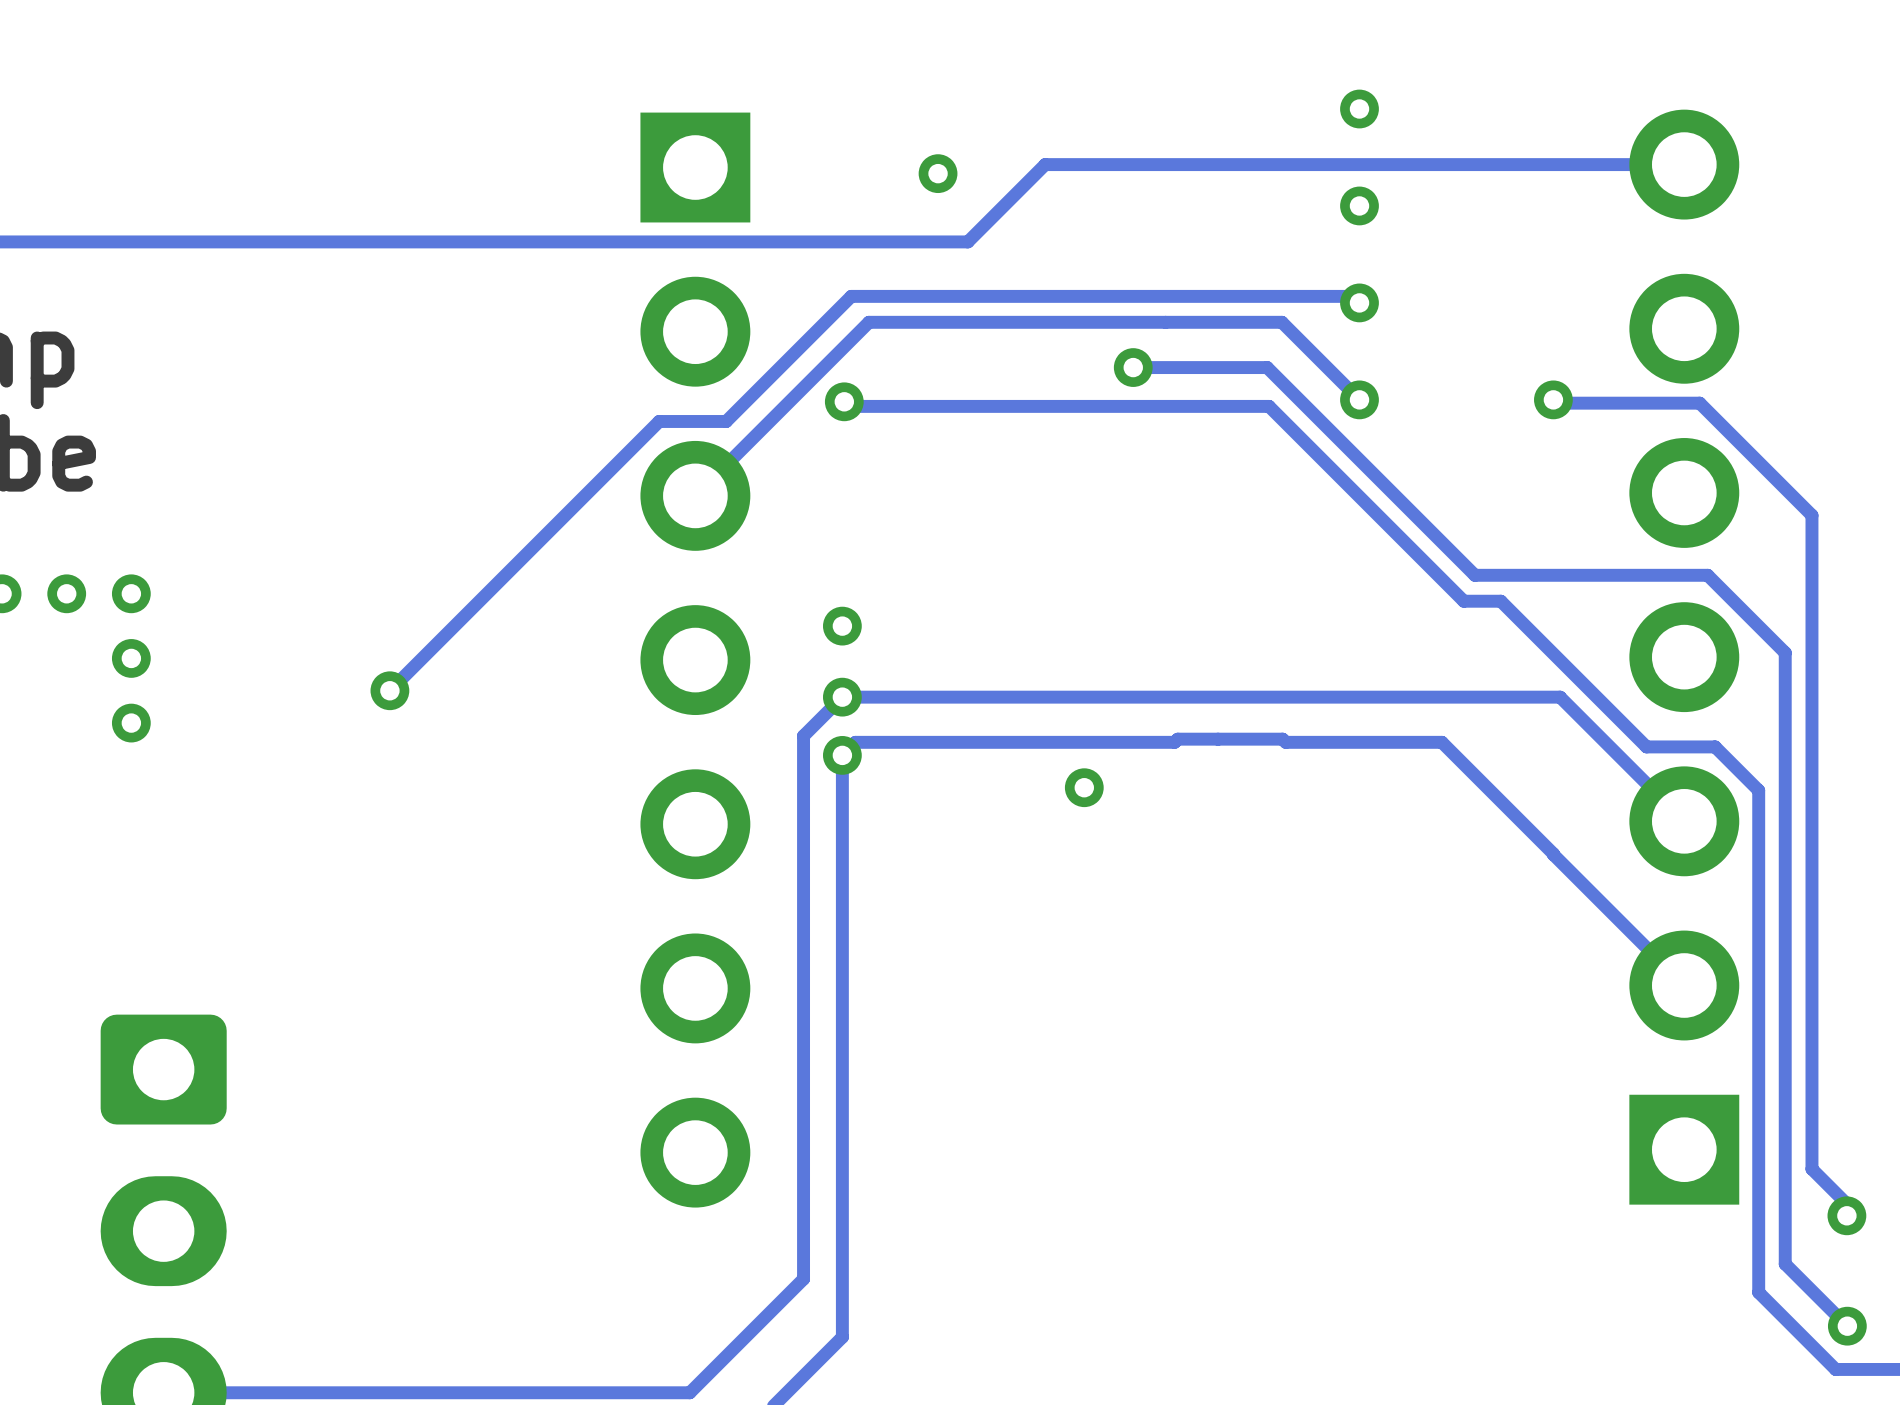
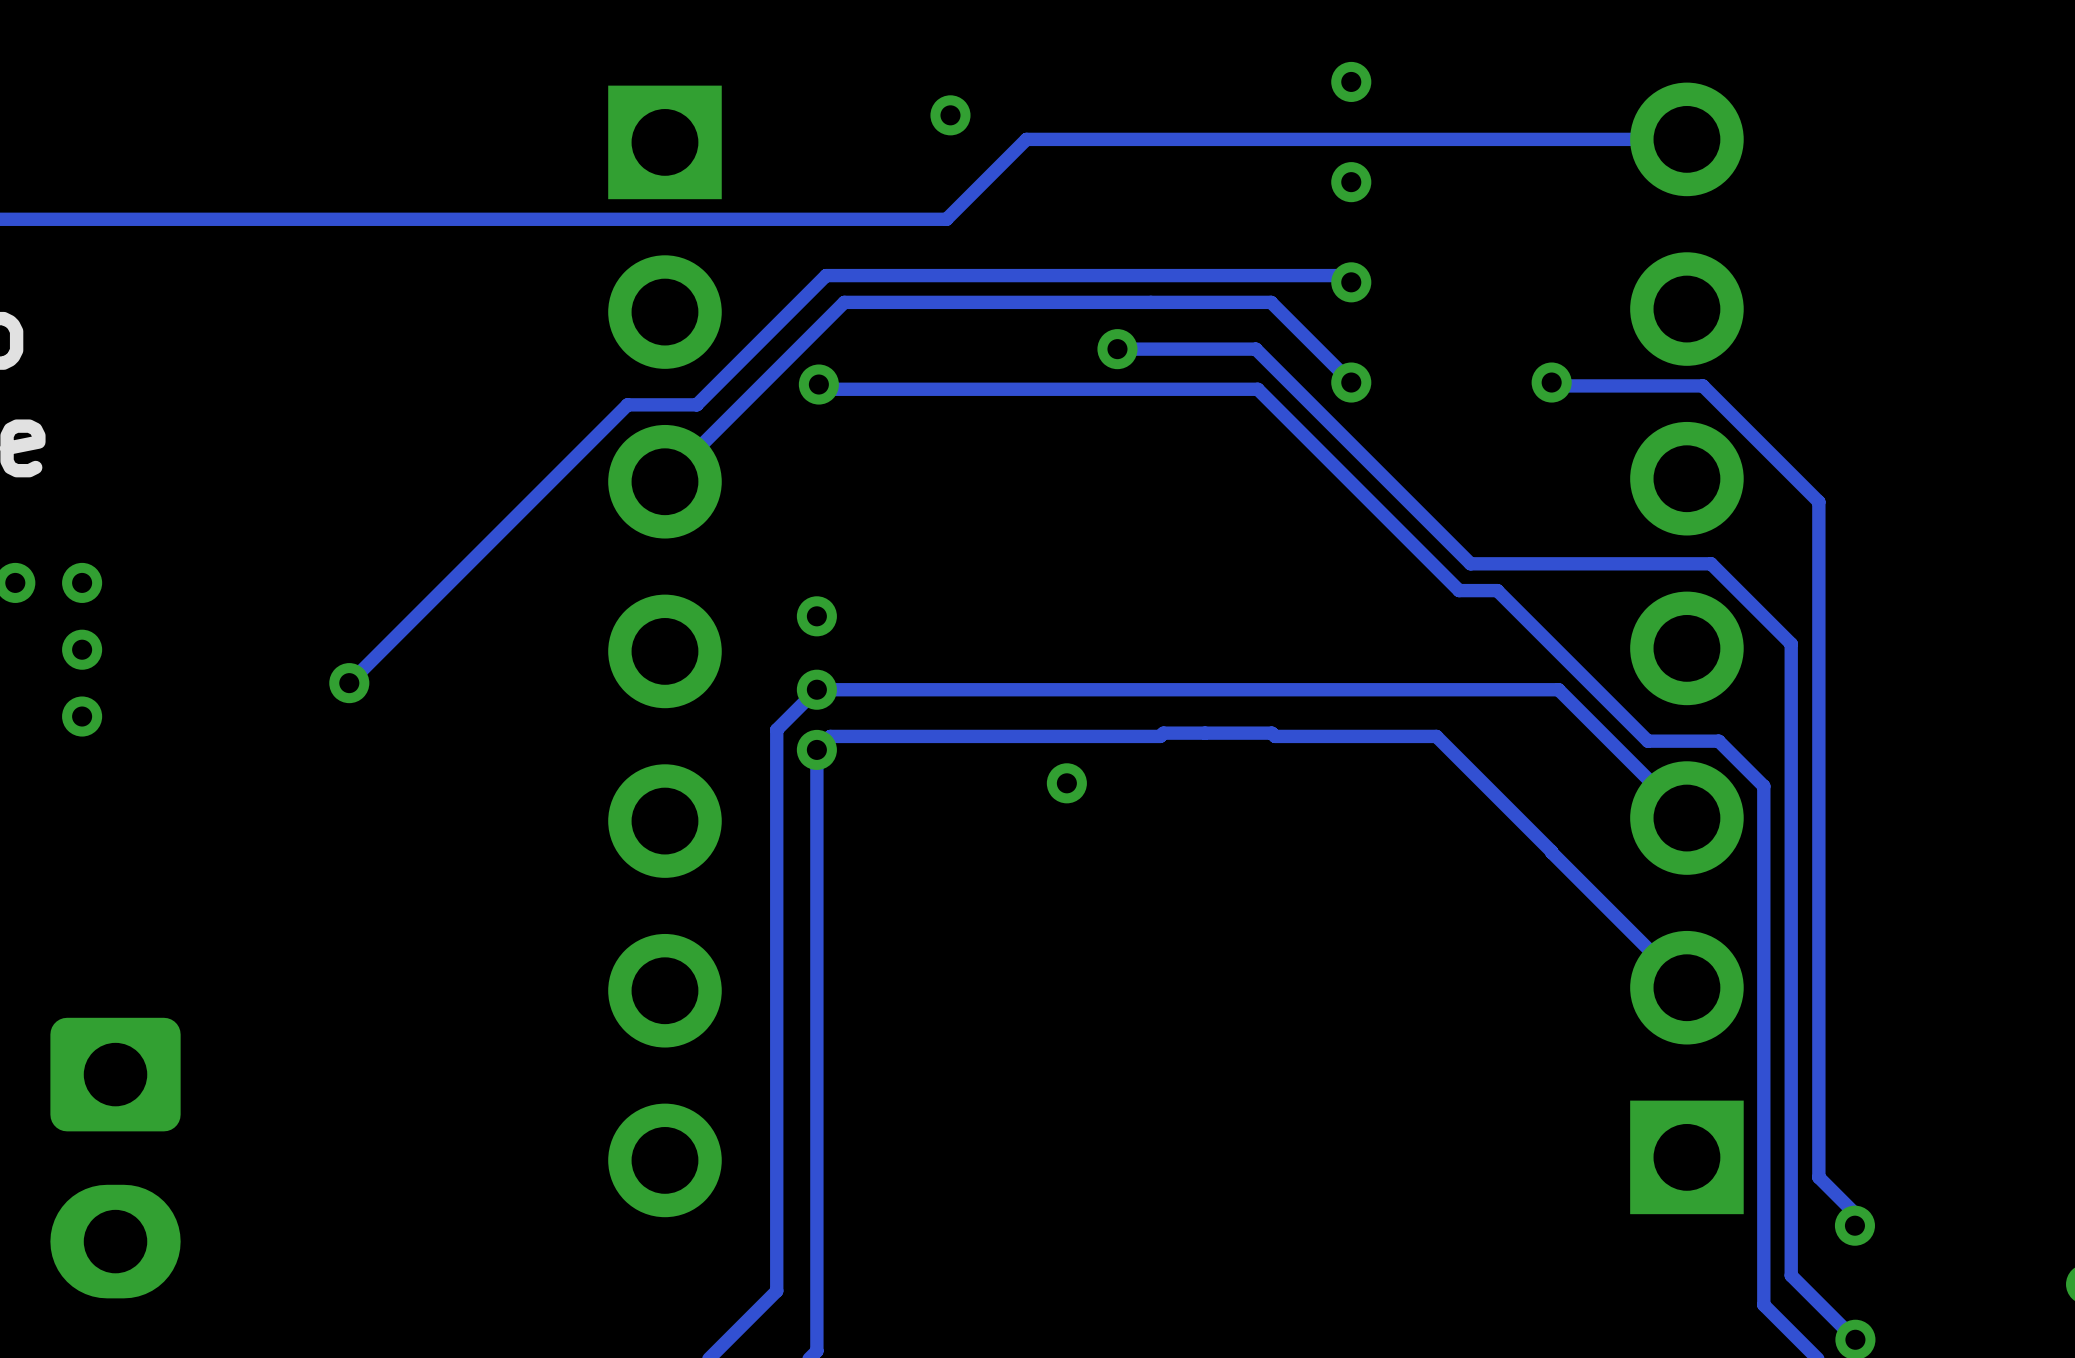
via position: (938, 173) -> (950, 115)

